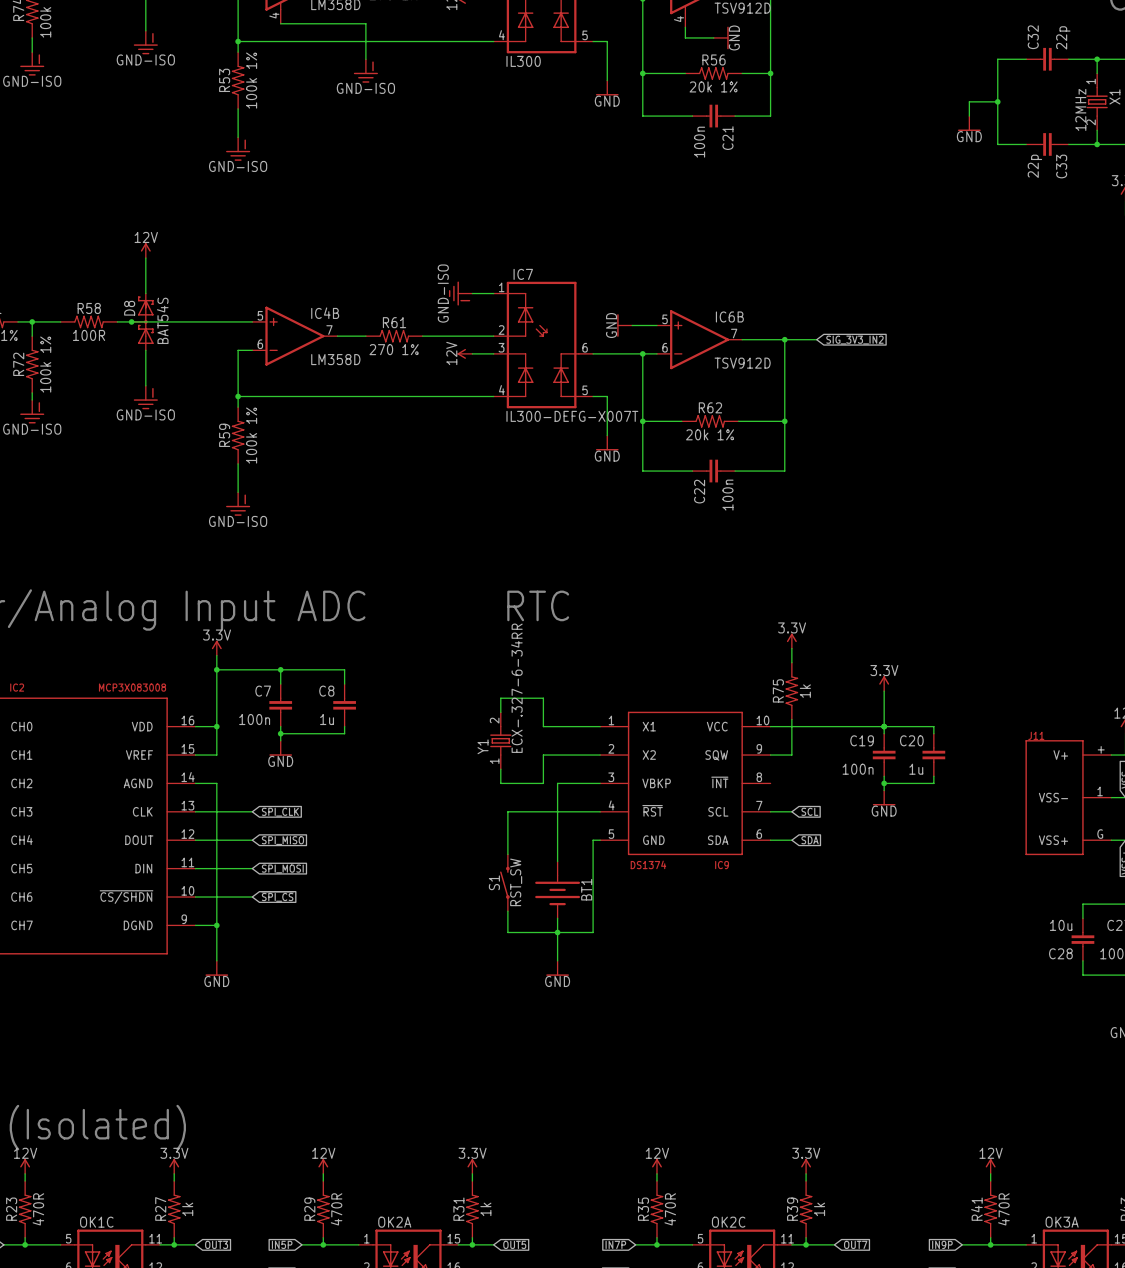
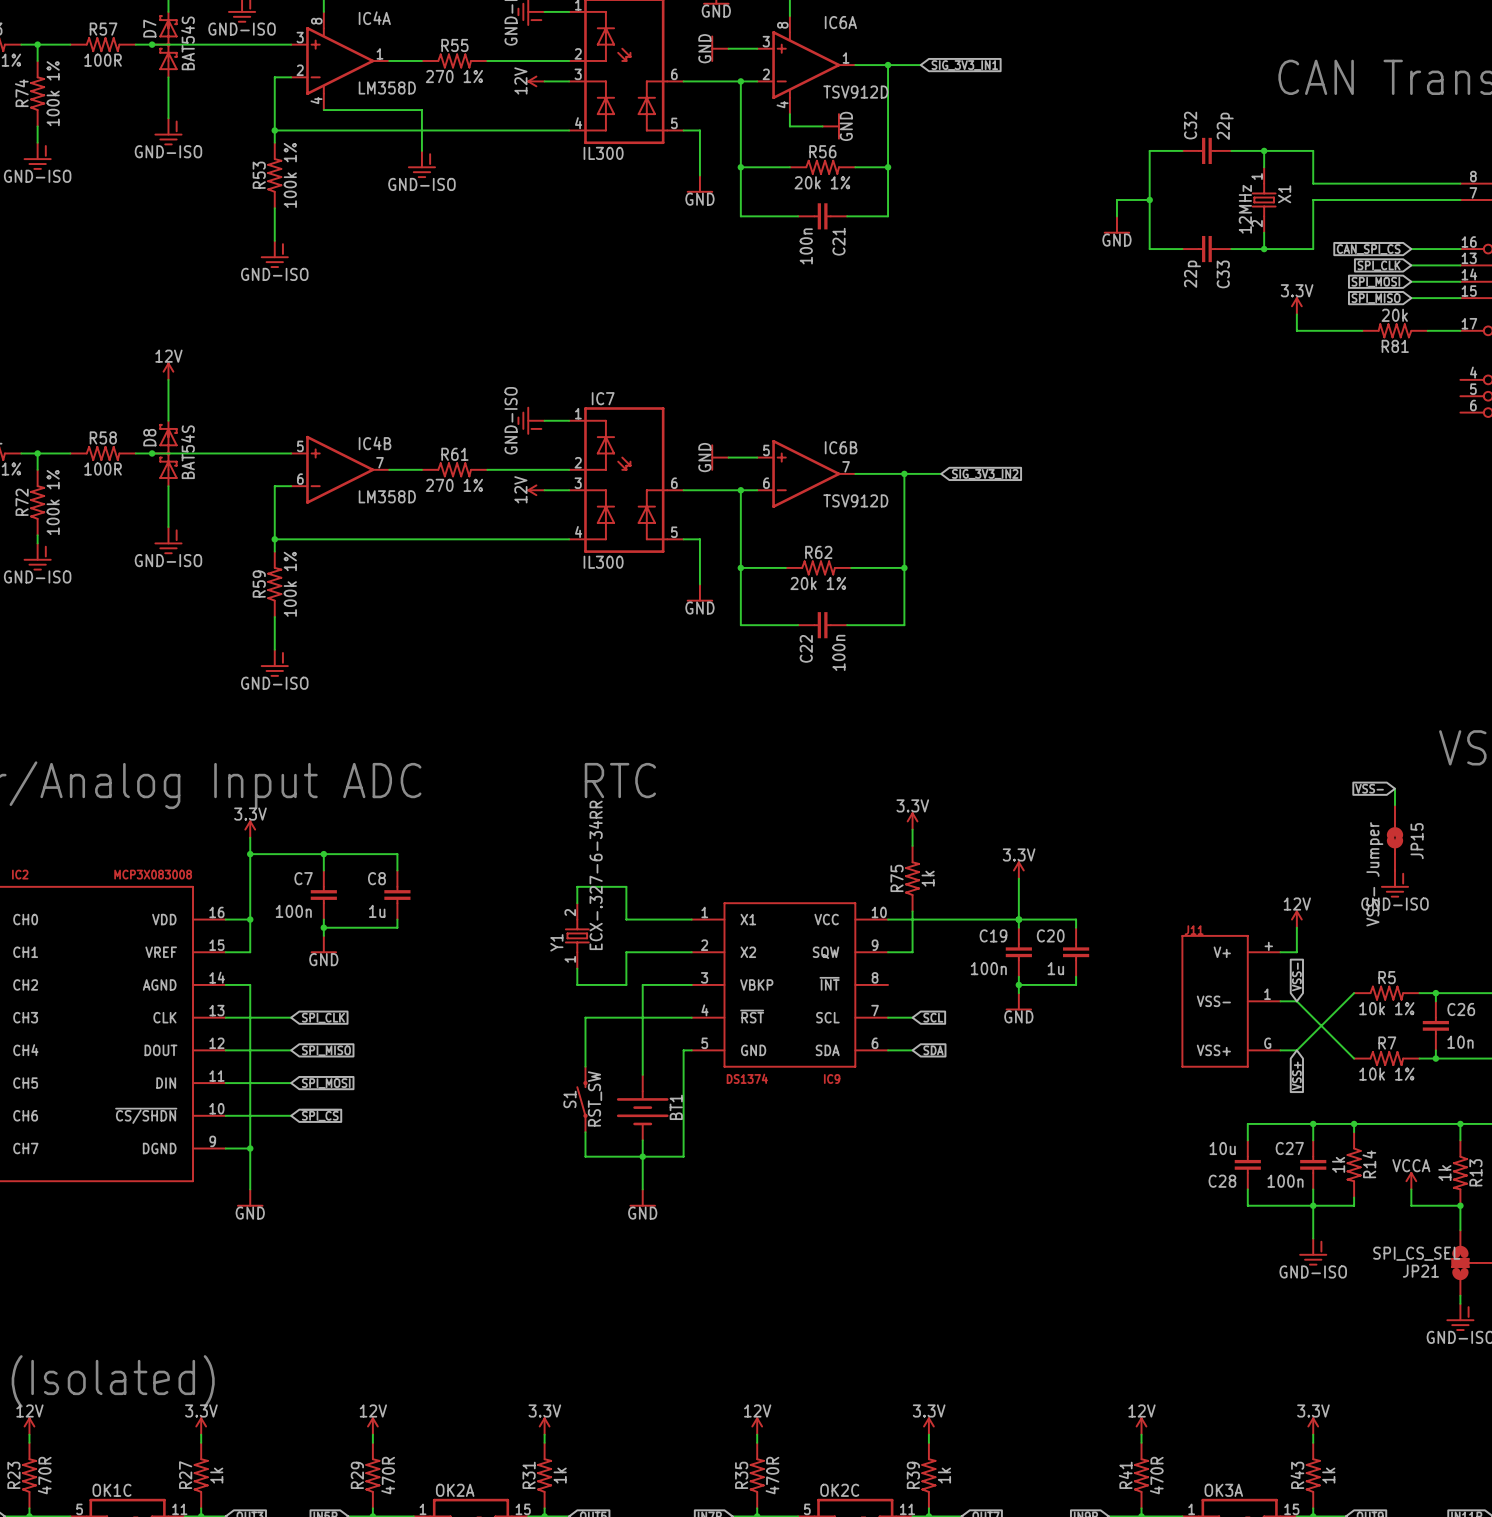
IC7 value: IL300-DEFG-X007T (572, 416) -> IL300 (603, 562)

